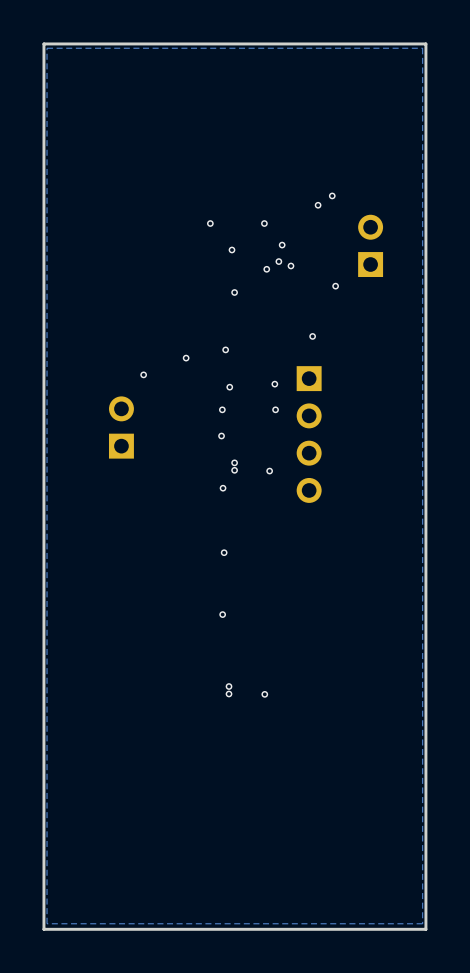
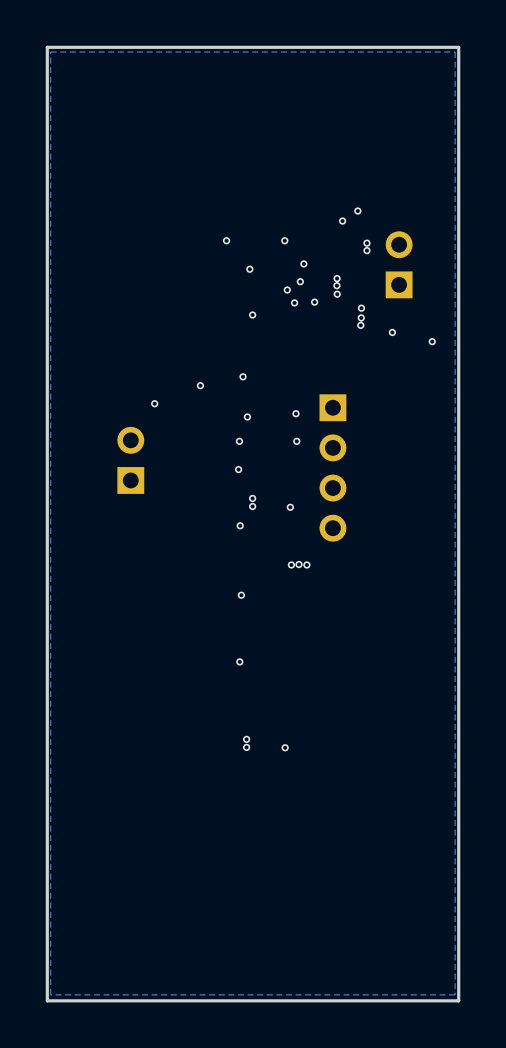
via: none -> (366, 243)
via: none -> (366, 250)
via: none -> (337, 278)
via: (290, 265) -> none
via: none -> (336, 285)
via: none -> (337, 294)
via: none -> (314, 302)
via: none -> (294, 302)
via: none -> (361, 317)
via: none -> (360, 325)
via: none -> (392, 332)
via: none -> (432, 341)
via: (312, 336) -> none
via: none -> (291, 564)
via: none -> (298, 564)
via: none -> (306, 564)

